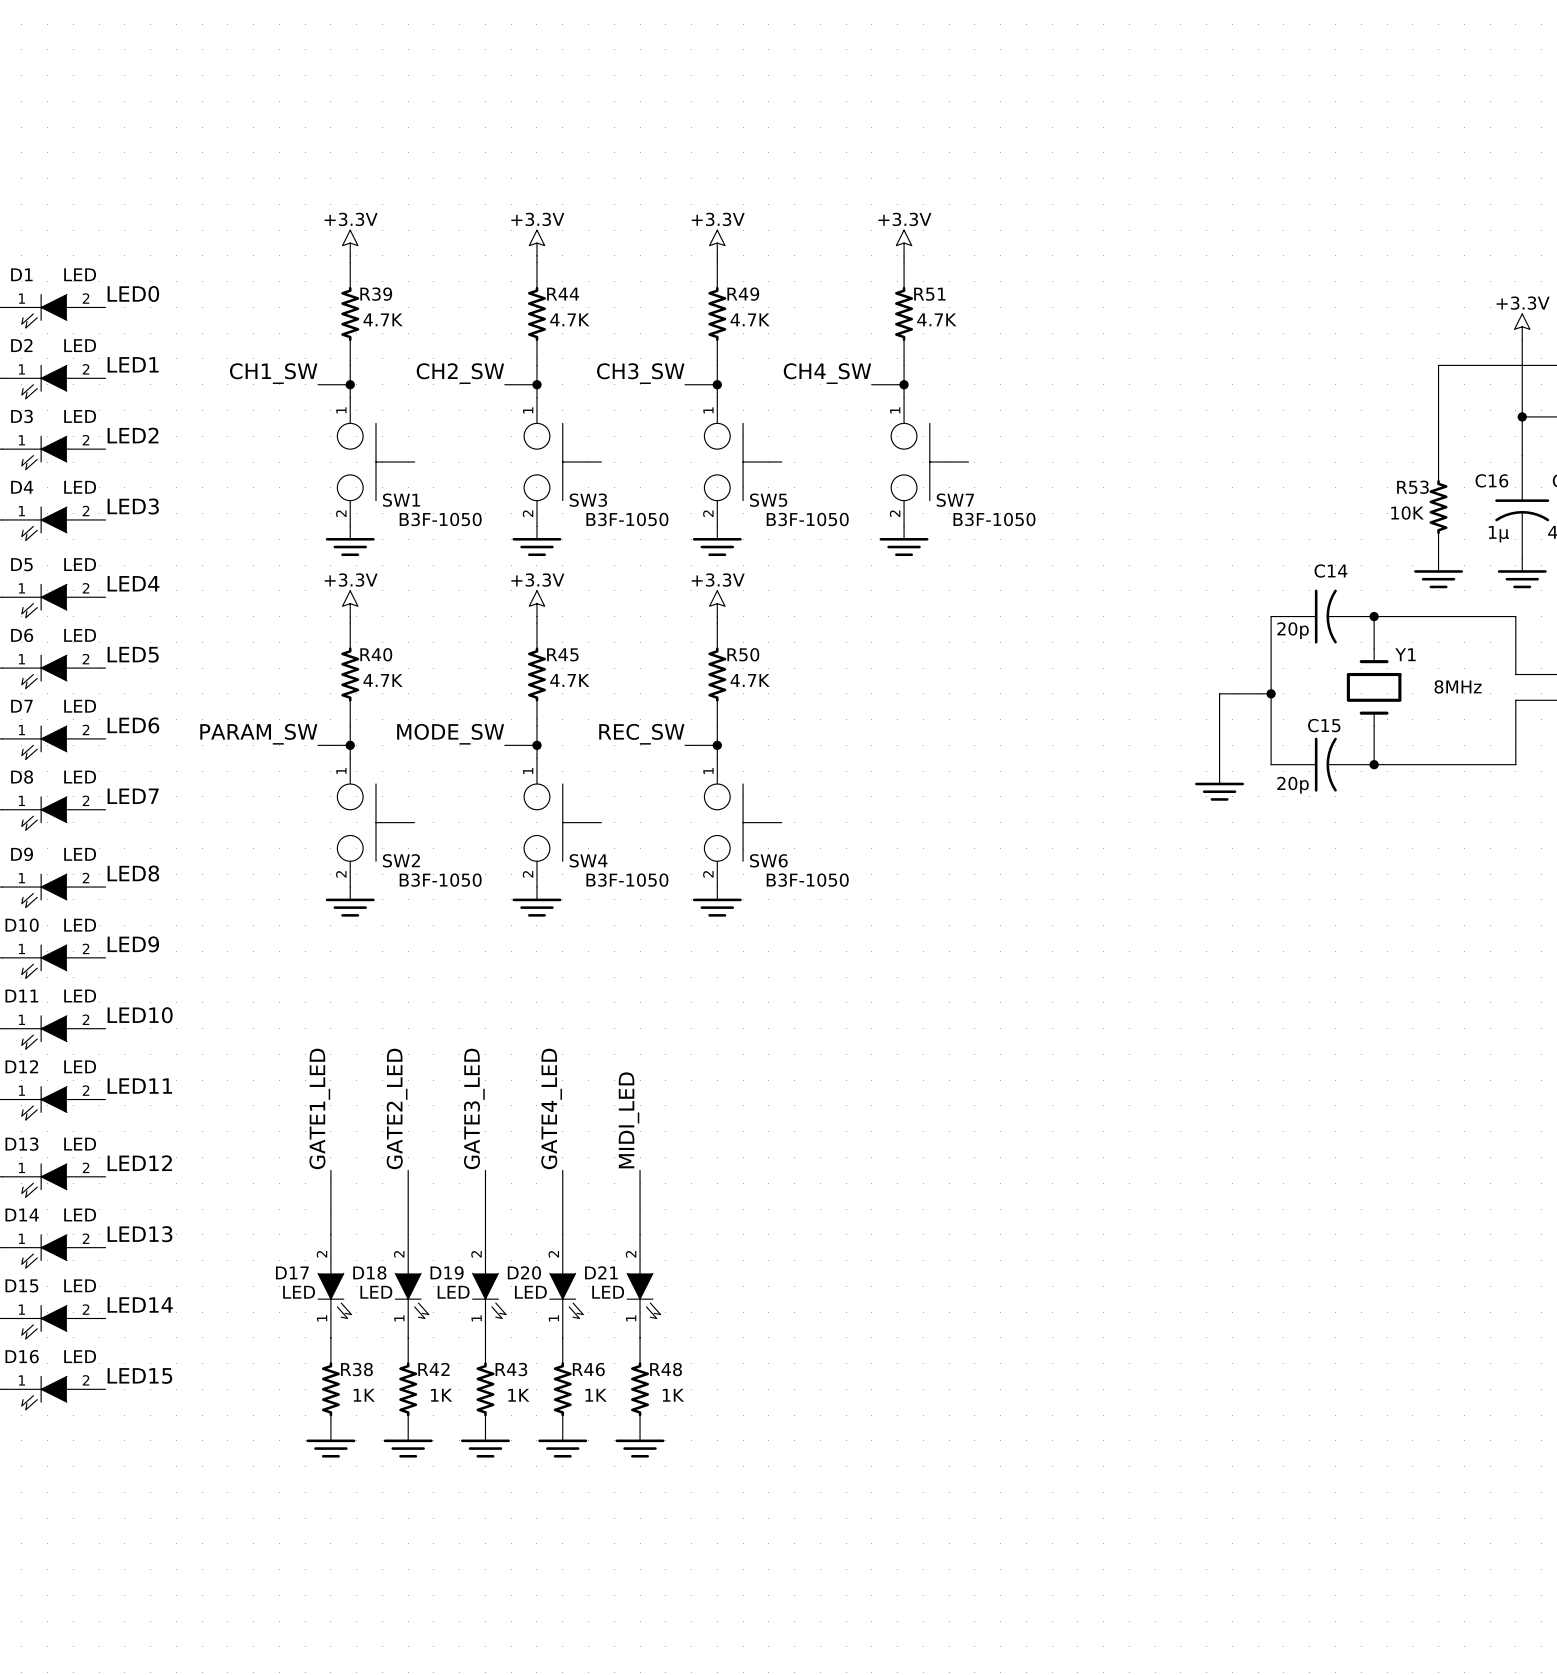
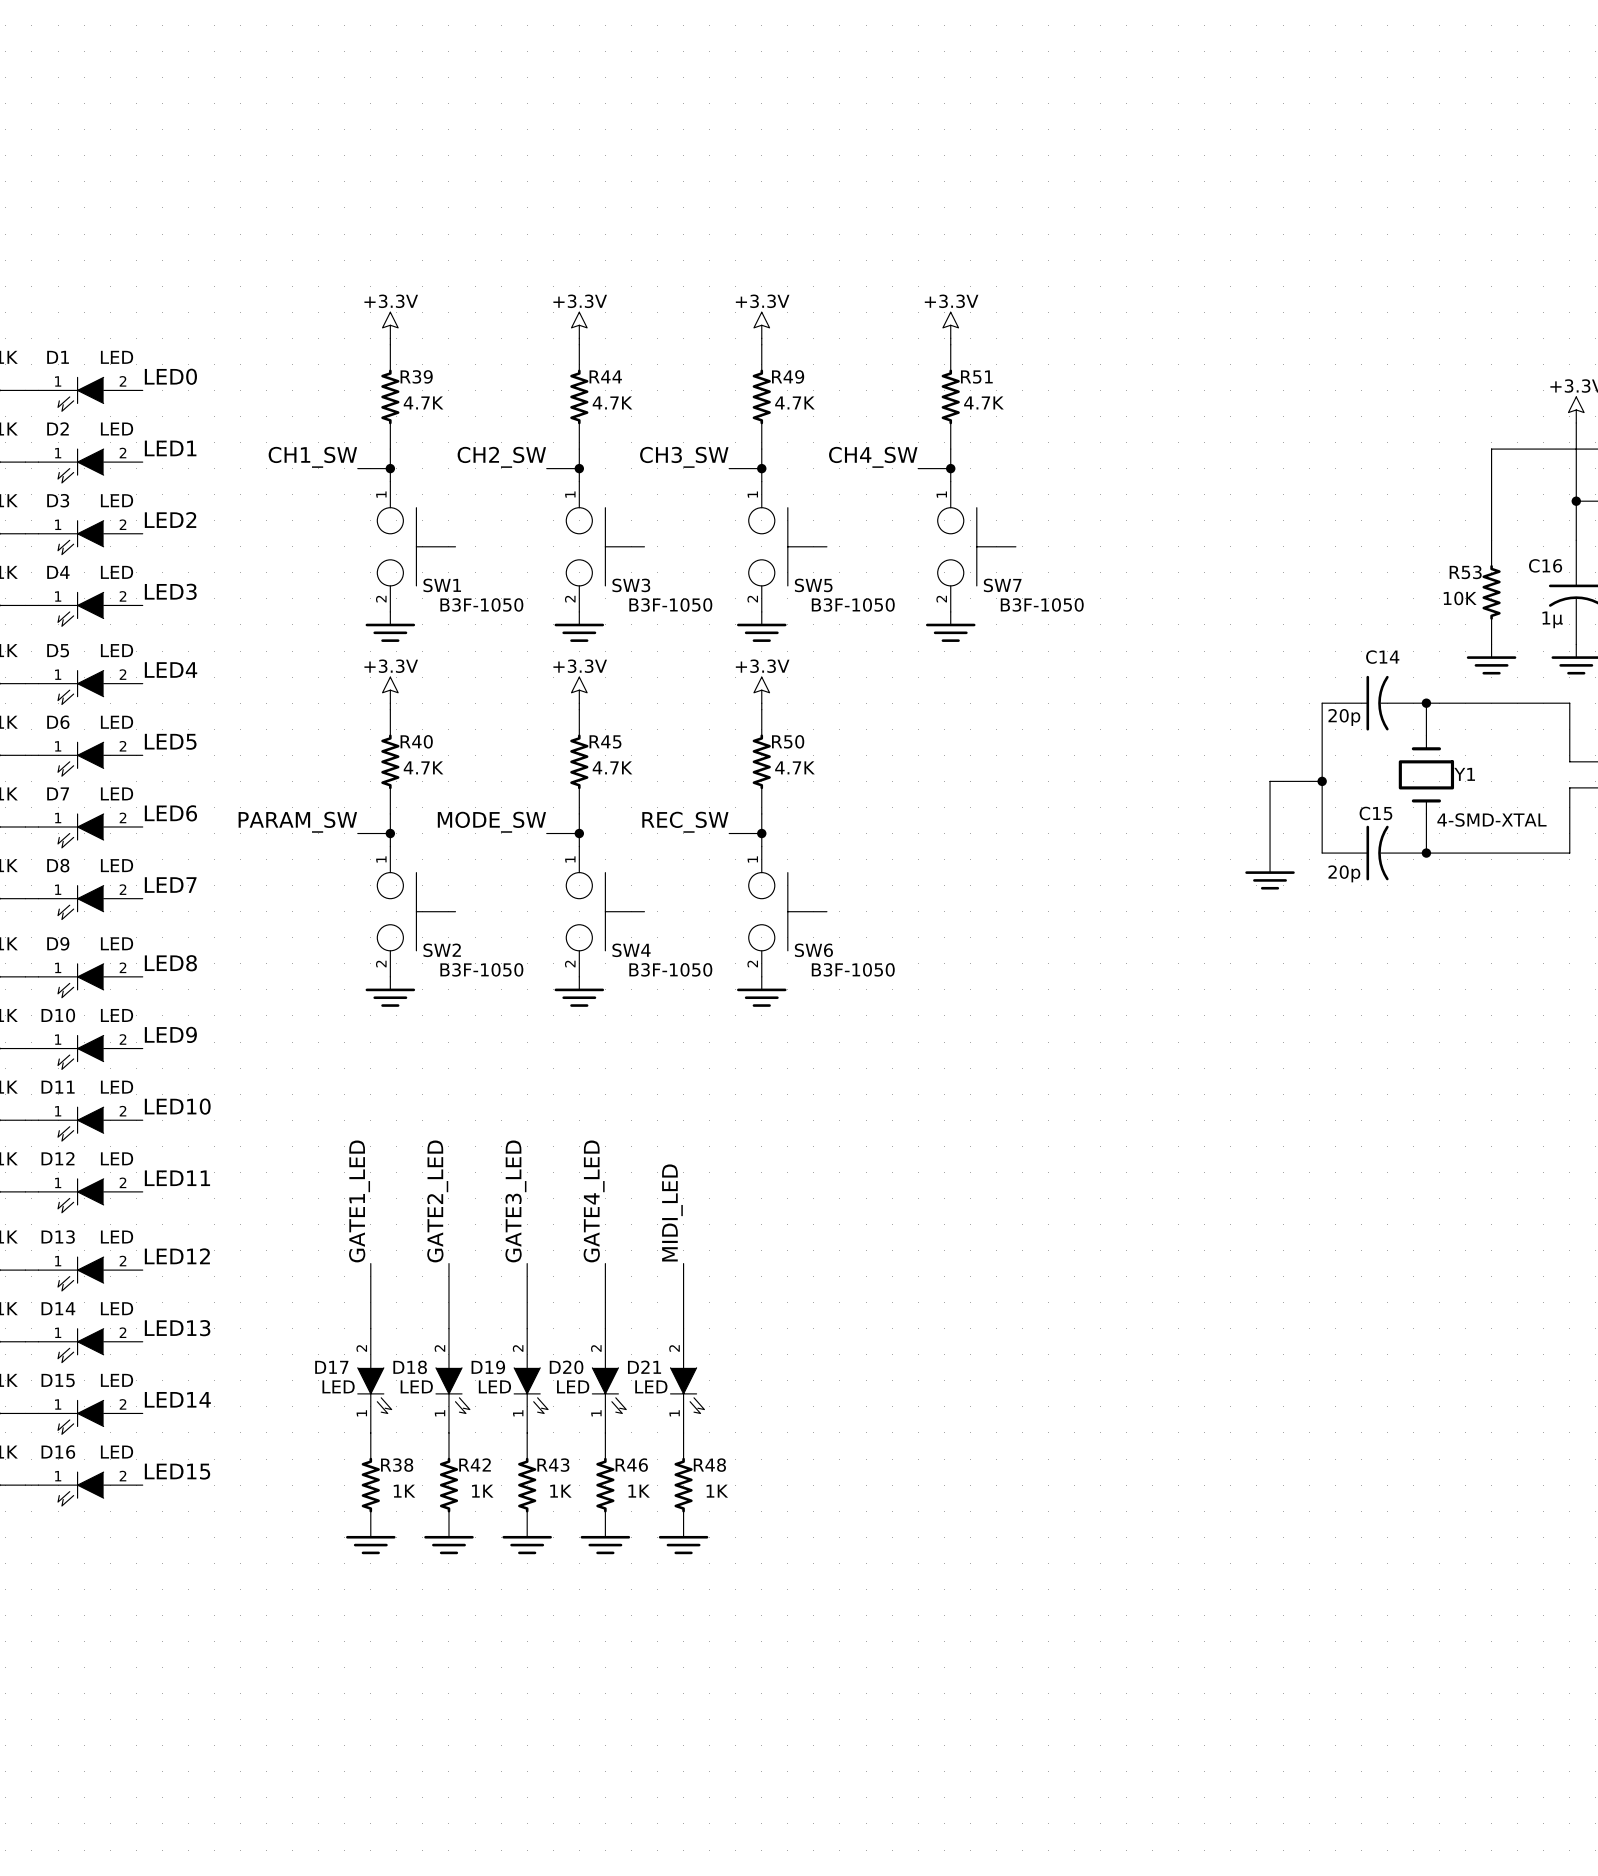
Y1 name position: Y1 (1405, 654) -> Y1 (1464, 774)
Y1 value: 8MHz (1458, 686) -> 4-SMD-XTAL (1491, 820)

